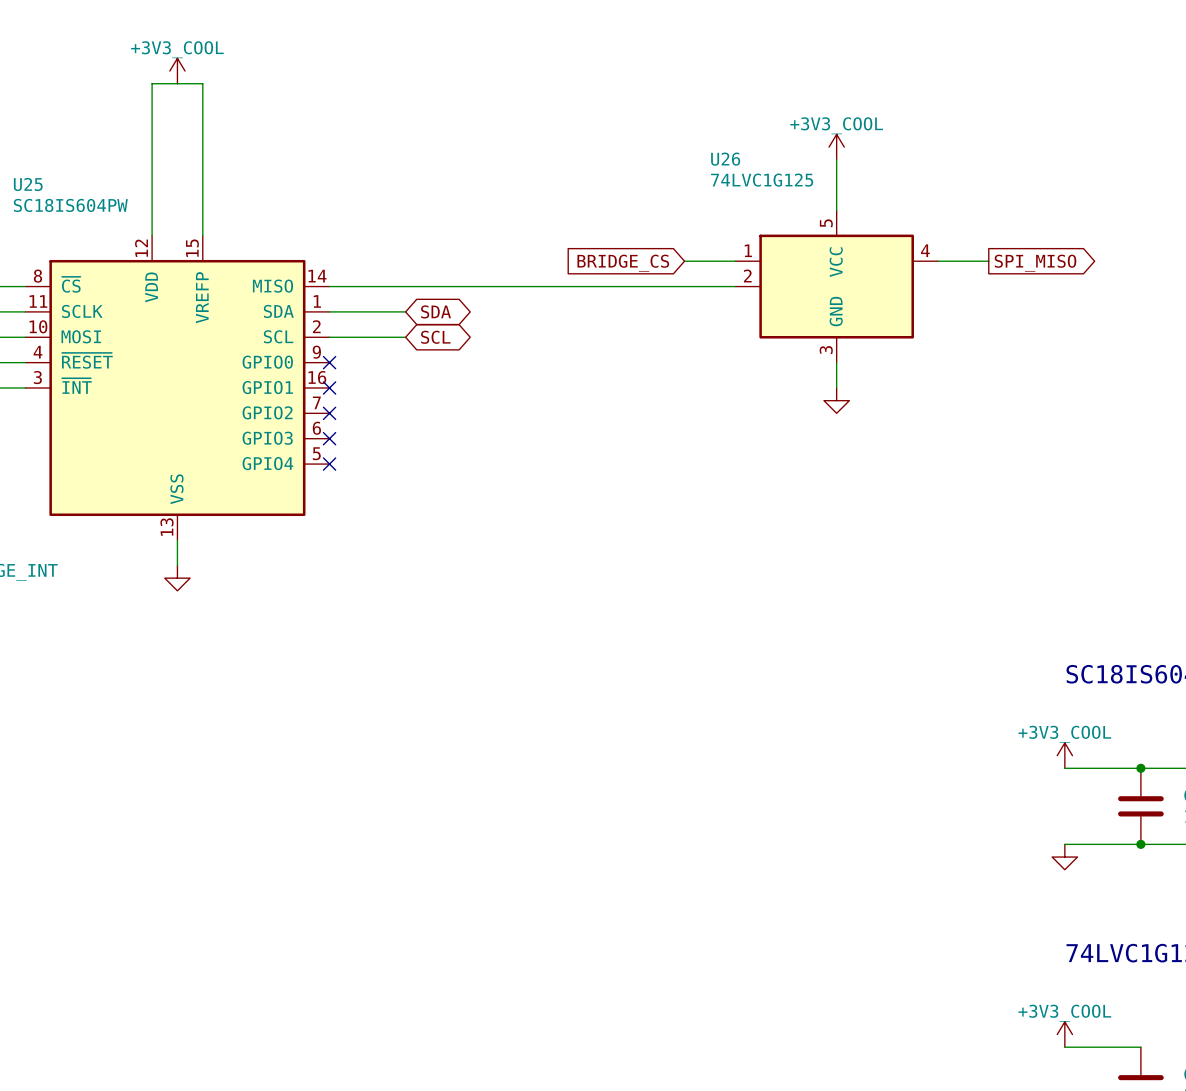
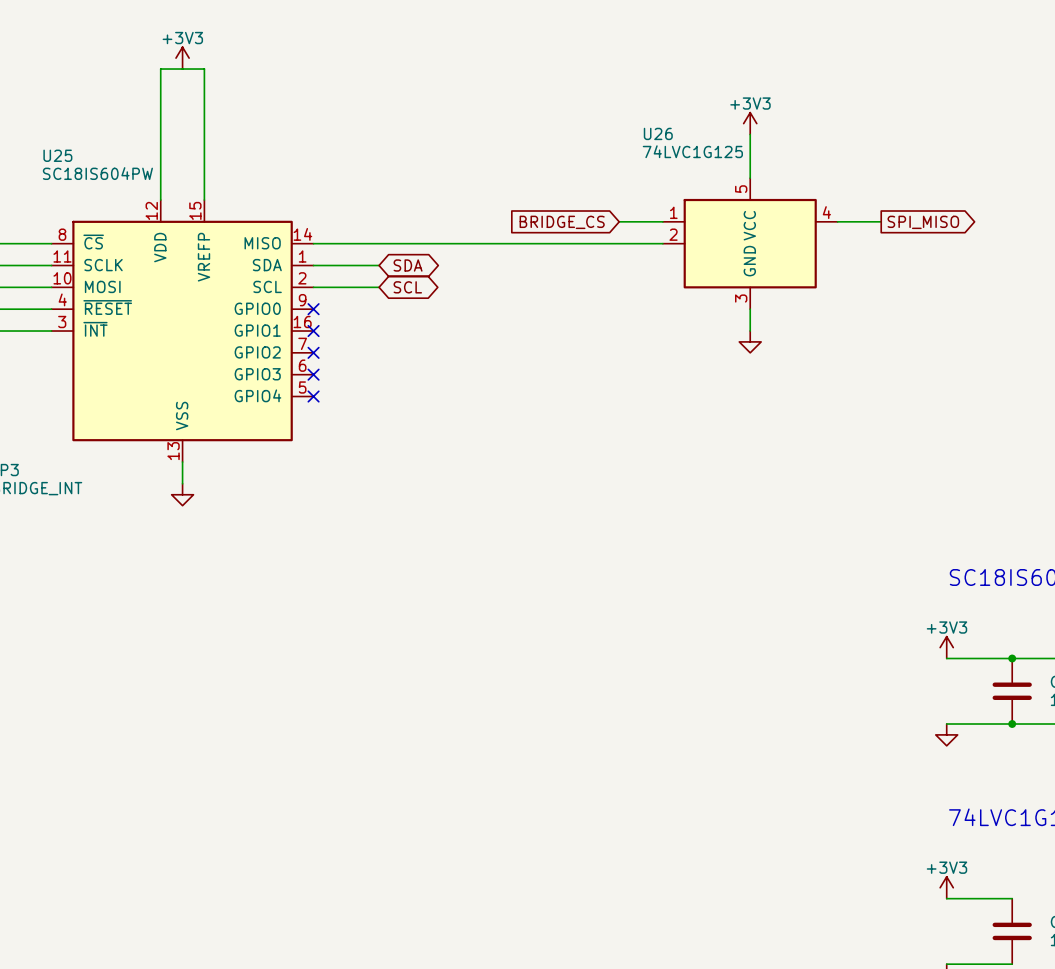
power symbol: +3V3_COOL (177, 71) -> +3V3 (182, 58)
power symbol: +3V3_COOL (836, 147) -> +3V3 (750, 123)
power symbol: +3V3_COOL (1064, 755) -> +3V3 (946, 647)
power symbol: +3V3_COOL (1064, 1034) -> +3V3 (946, 887)

